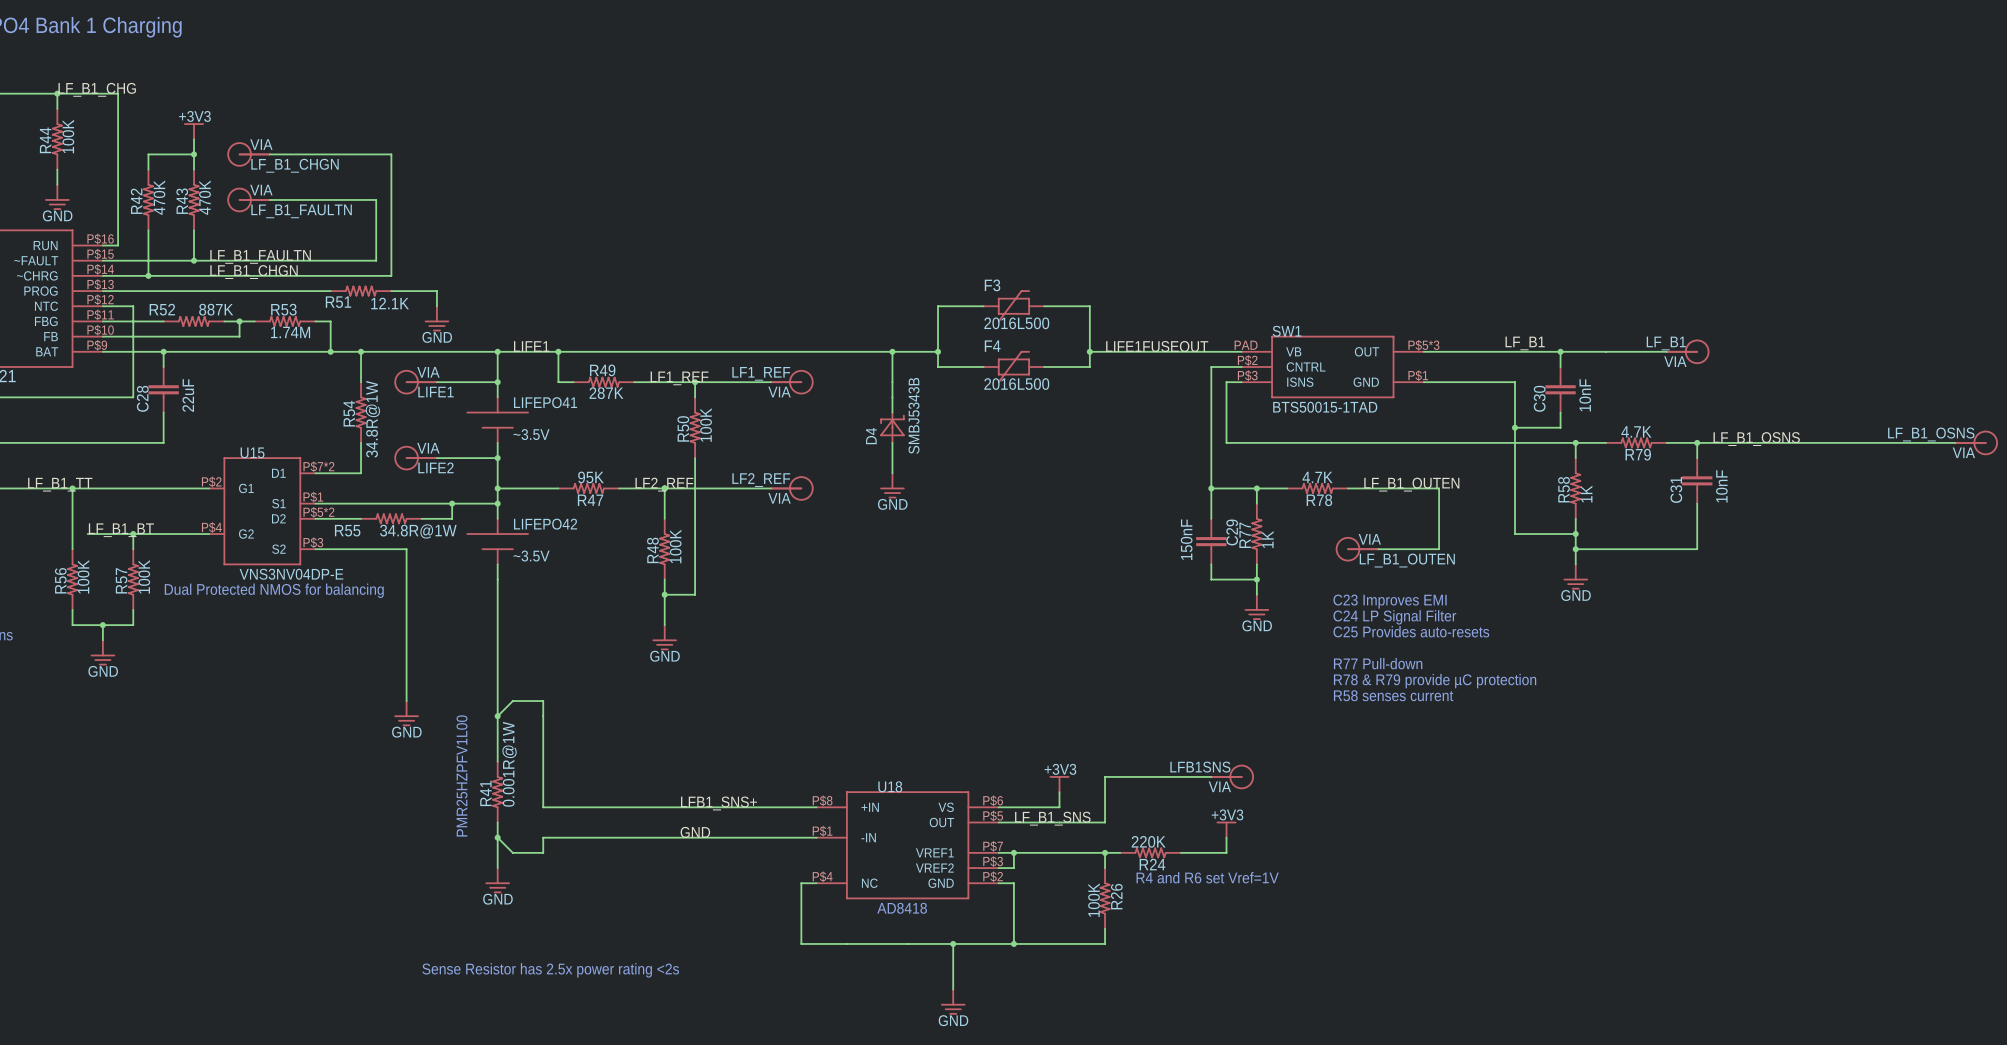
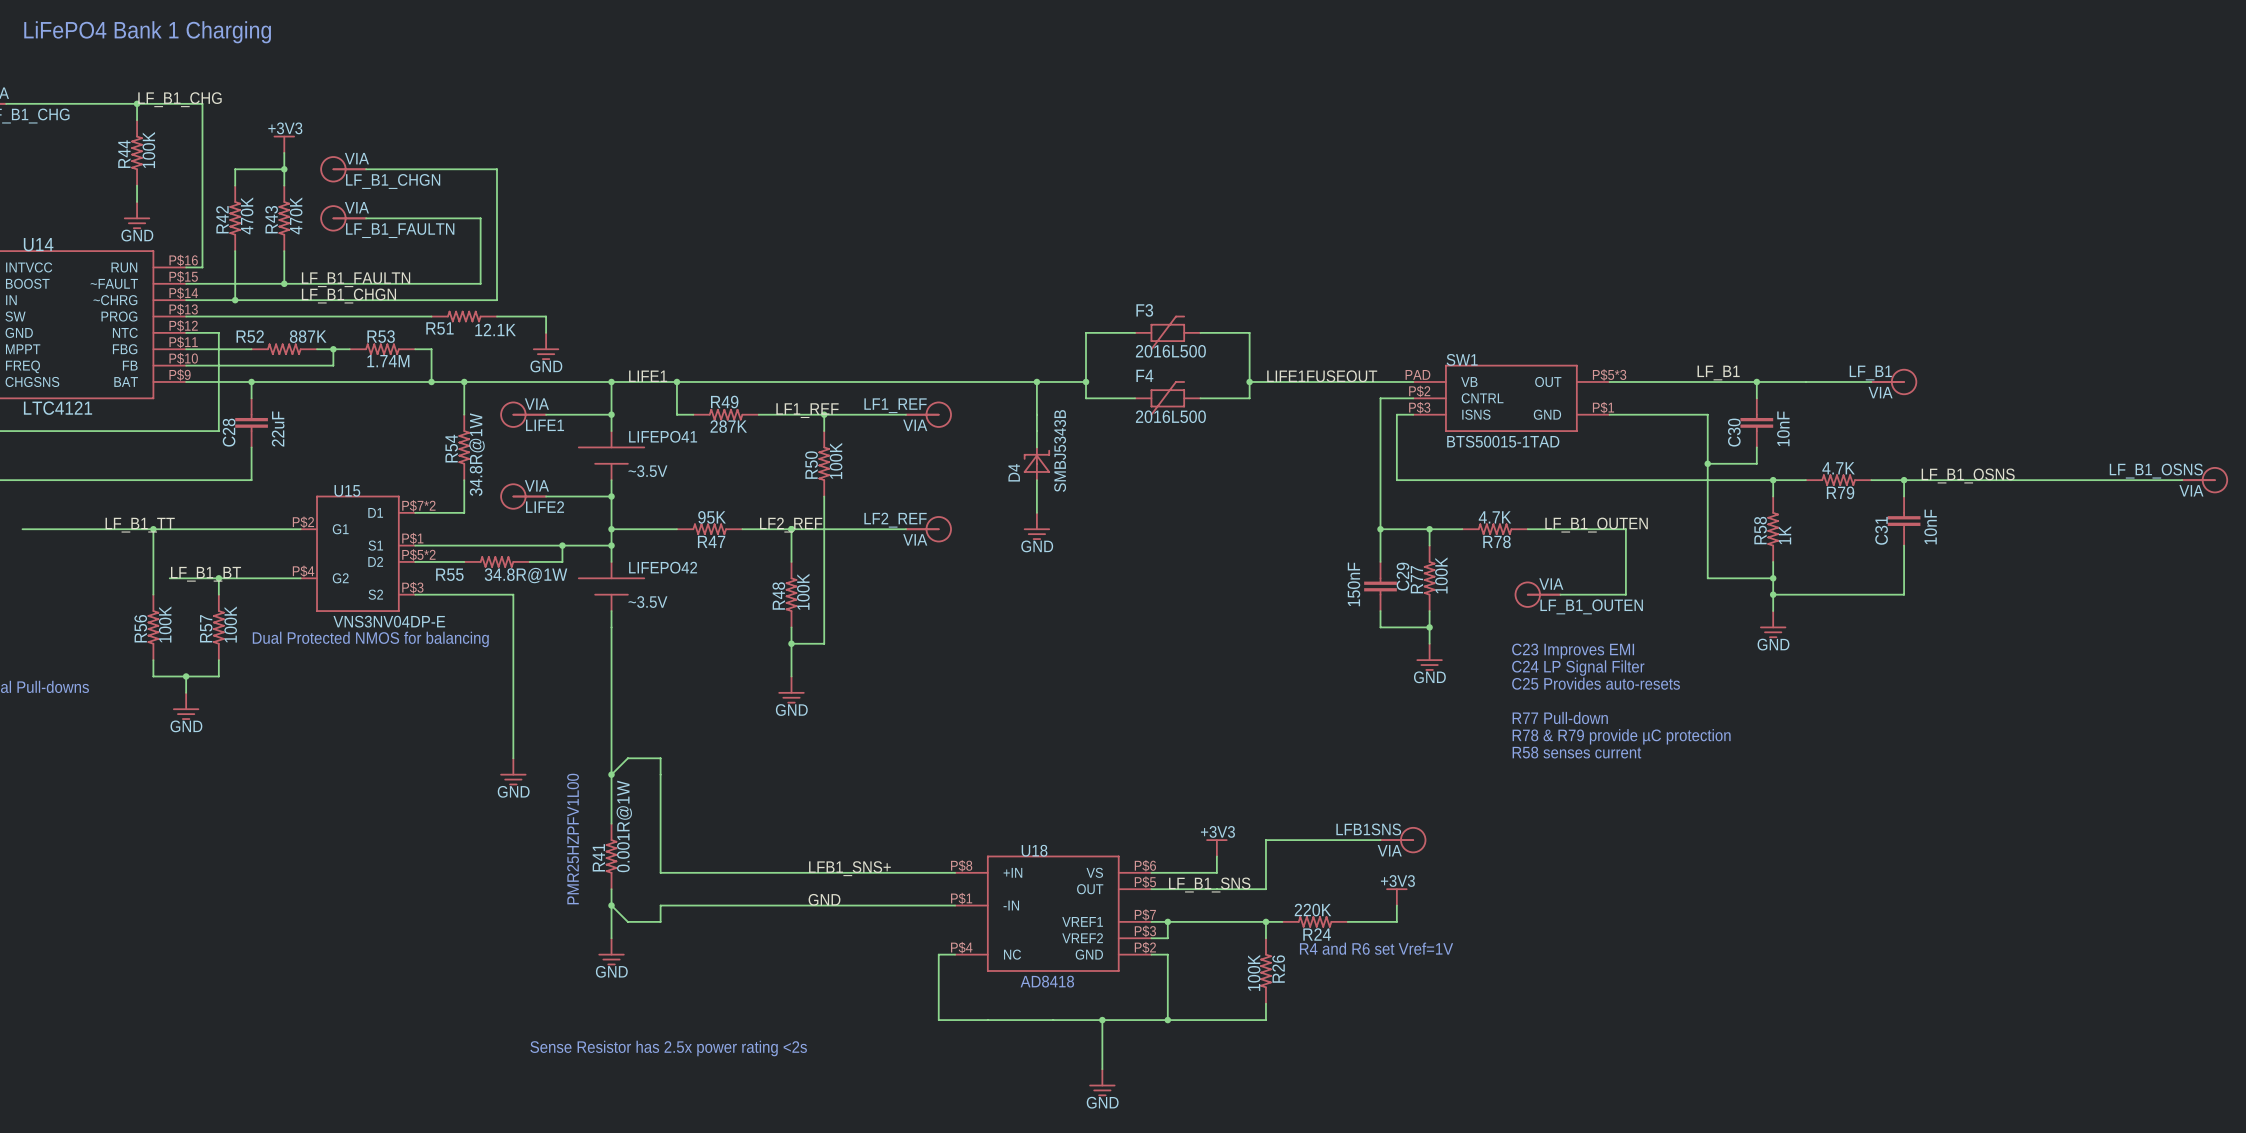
R77 value: 1K (1267, 539) -> 100K (1441, 575)

